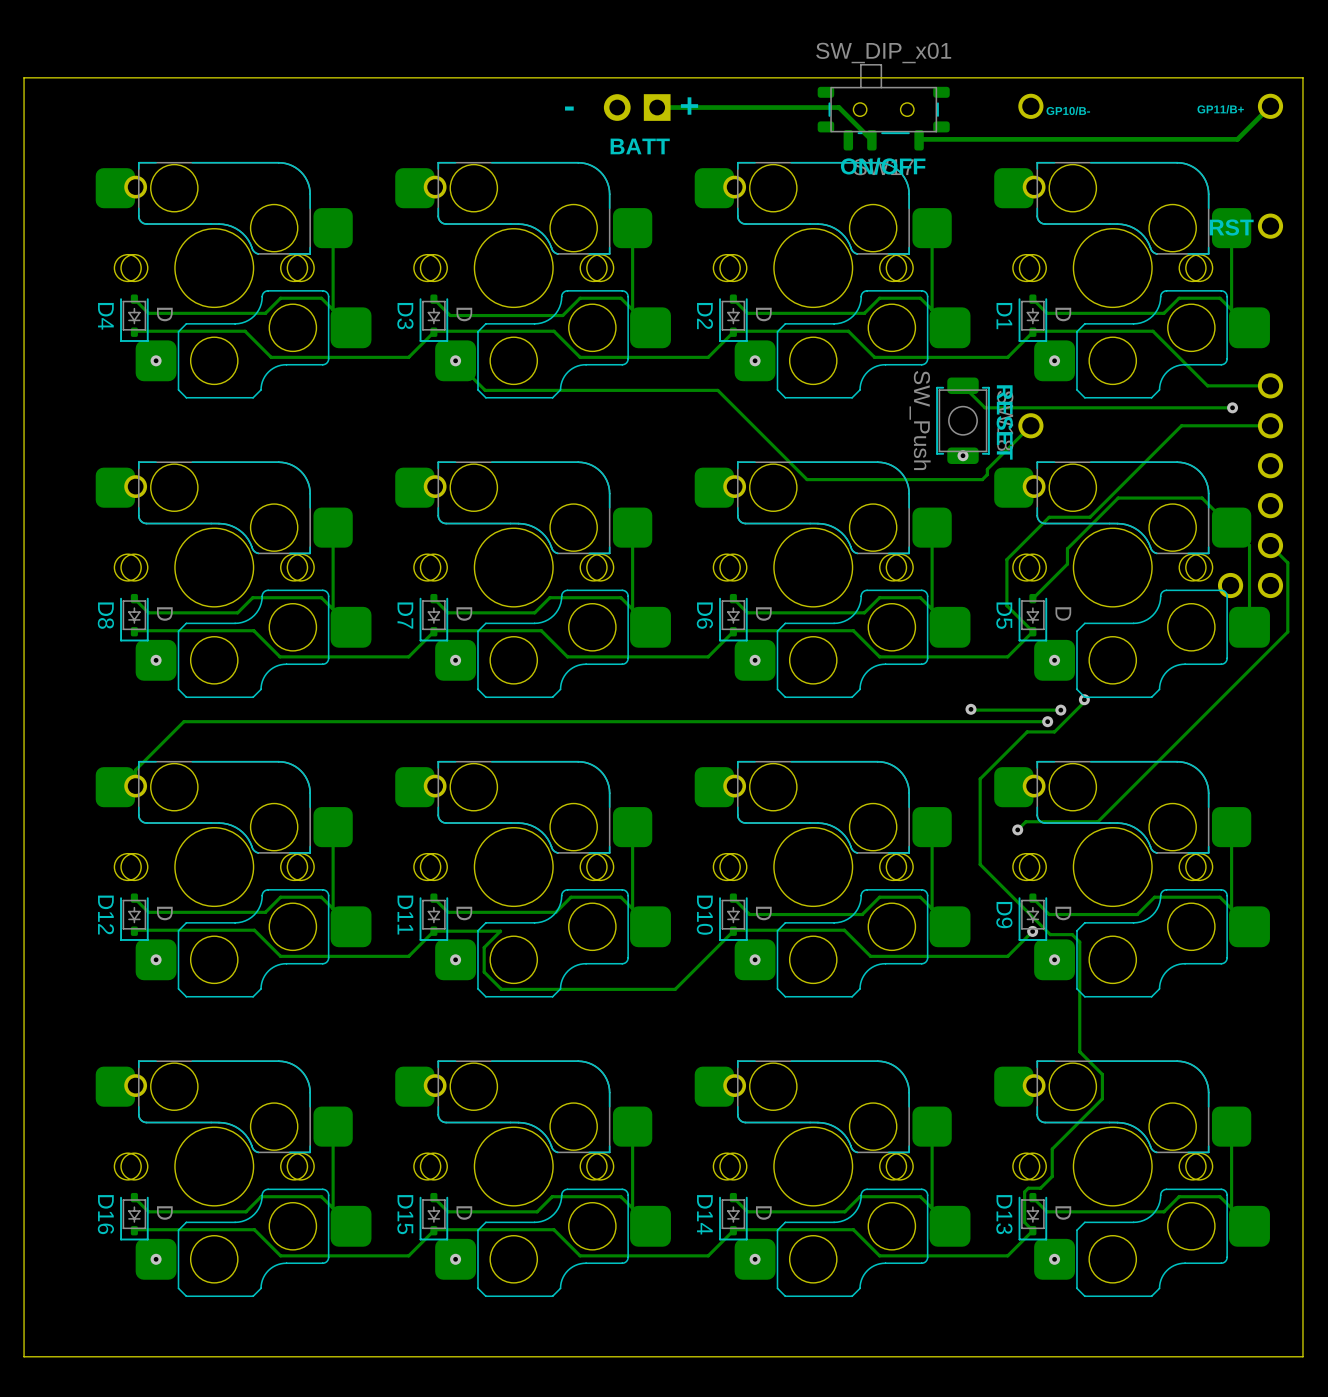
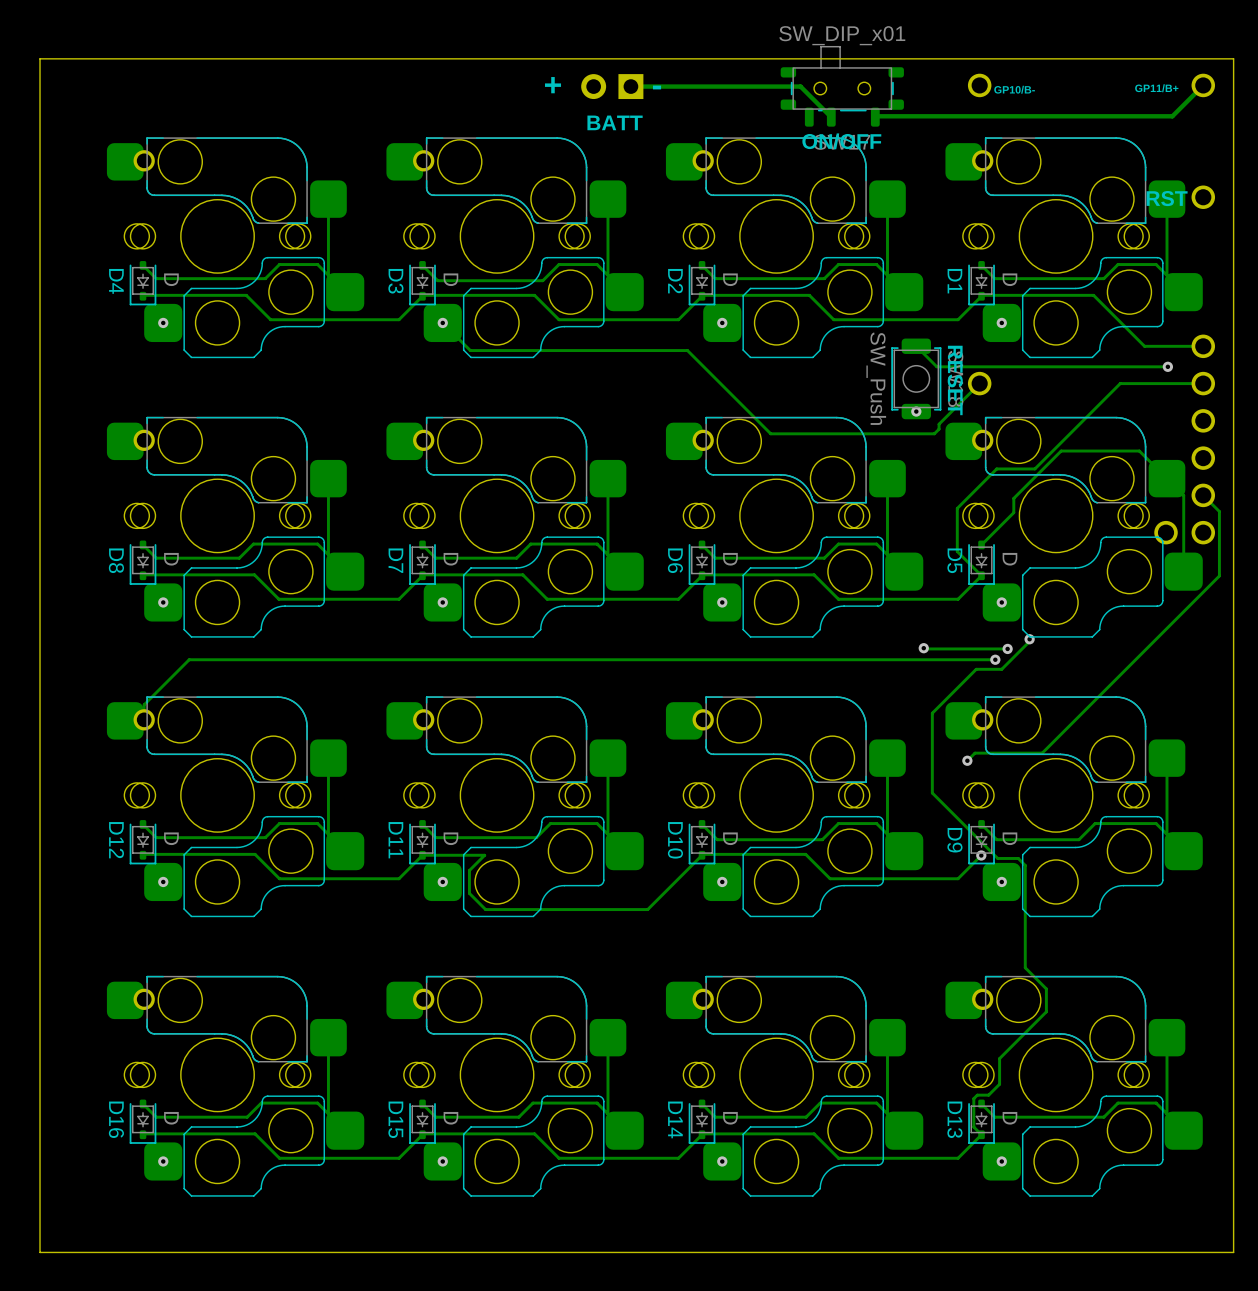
text: + (689, 106) -> - (657, 87)
text: - (569, 108) -> + (553, 85)

